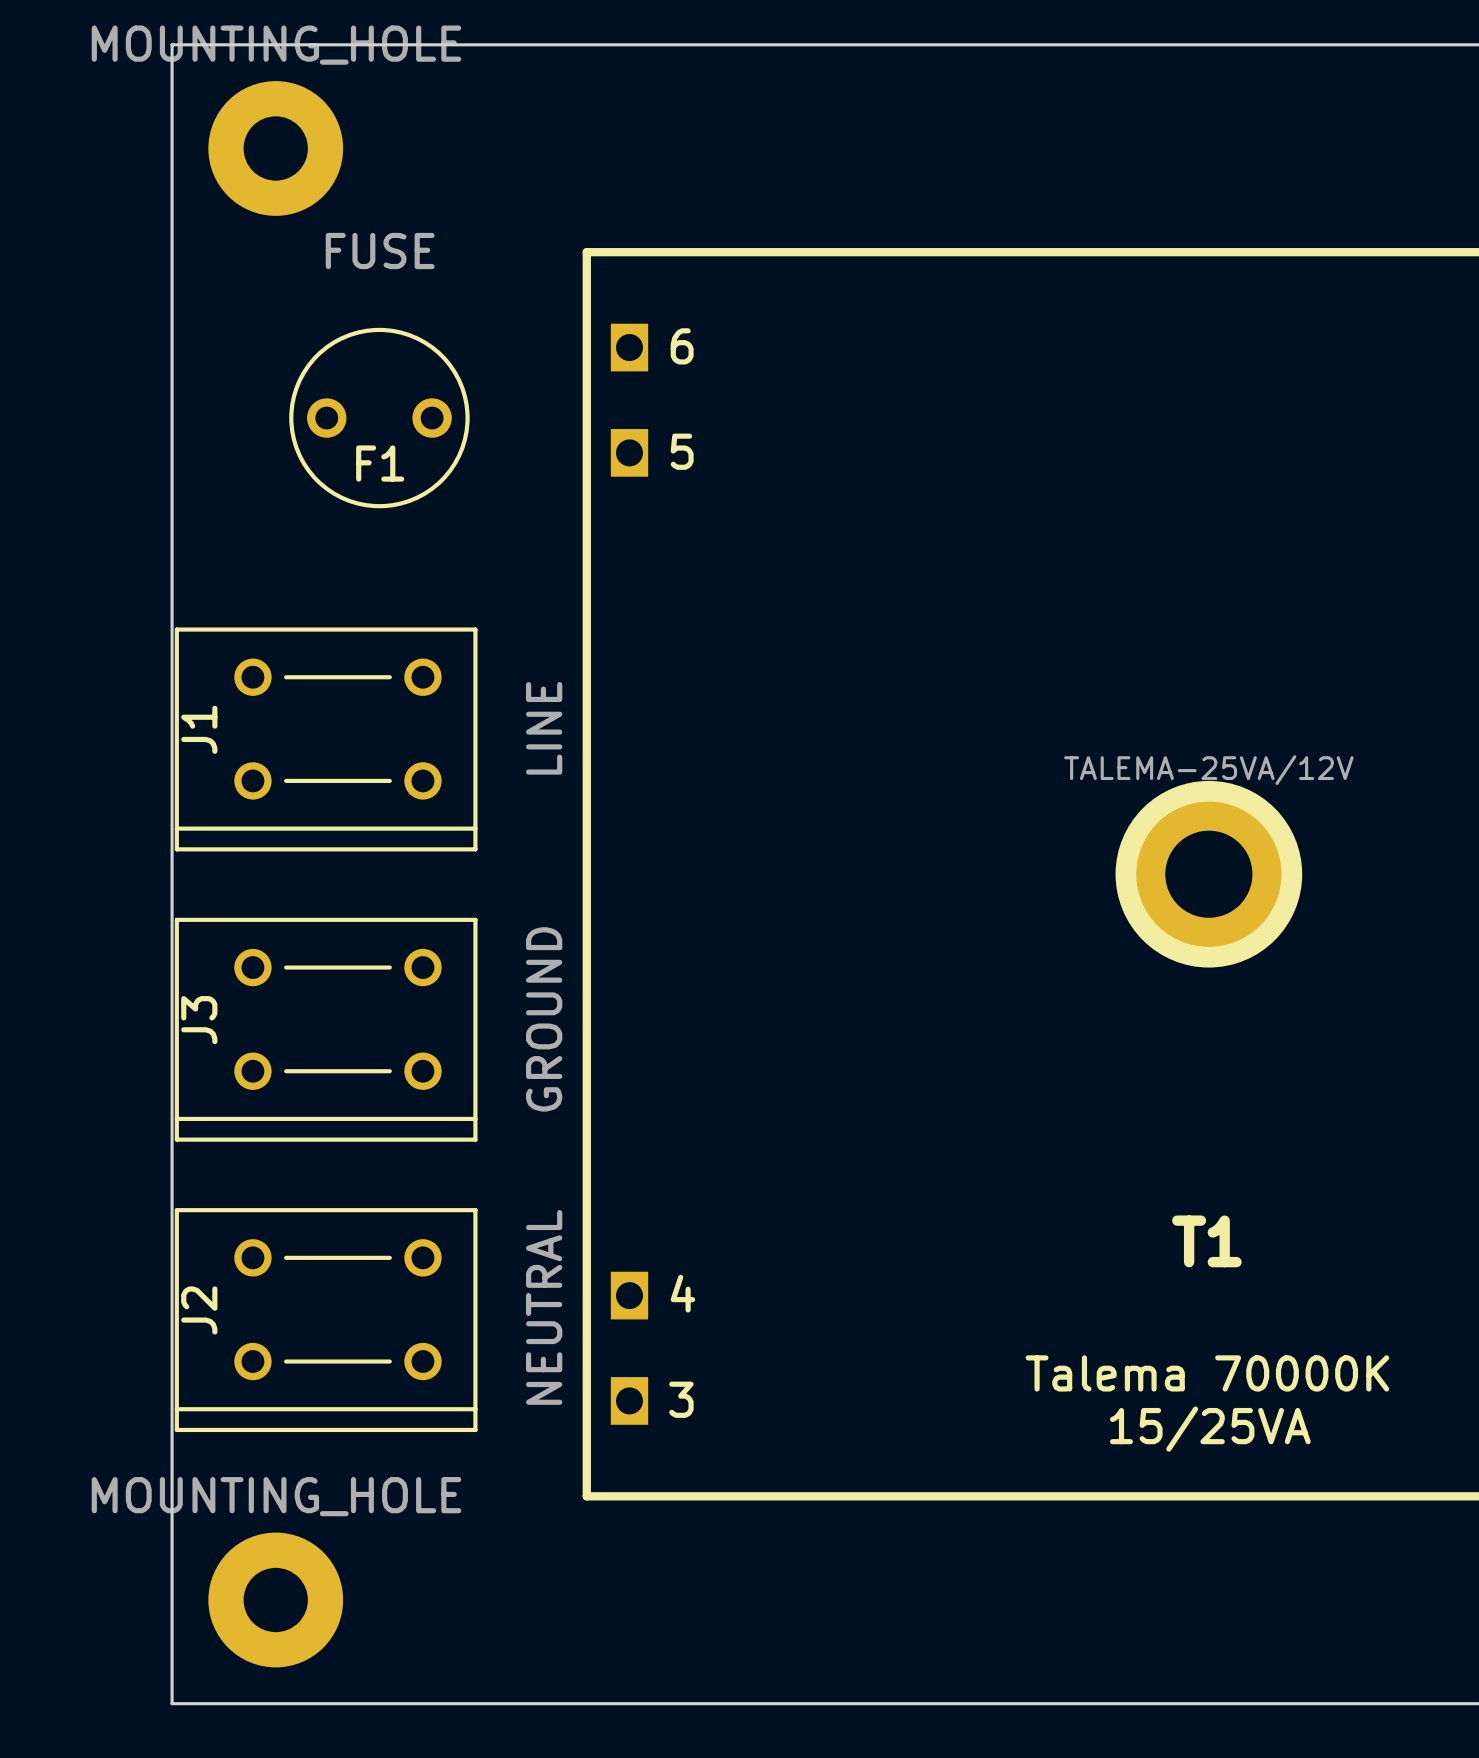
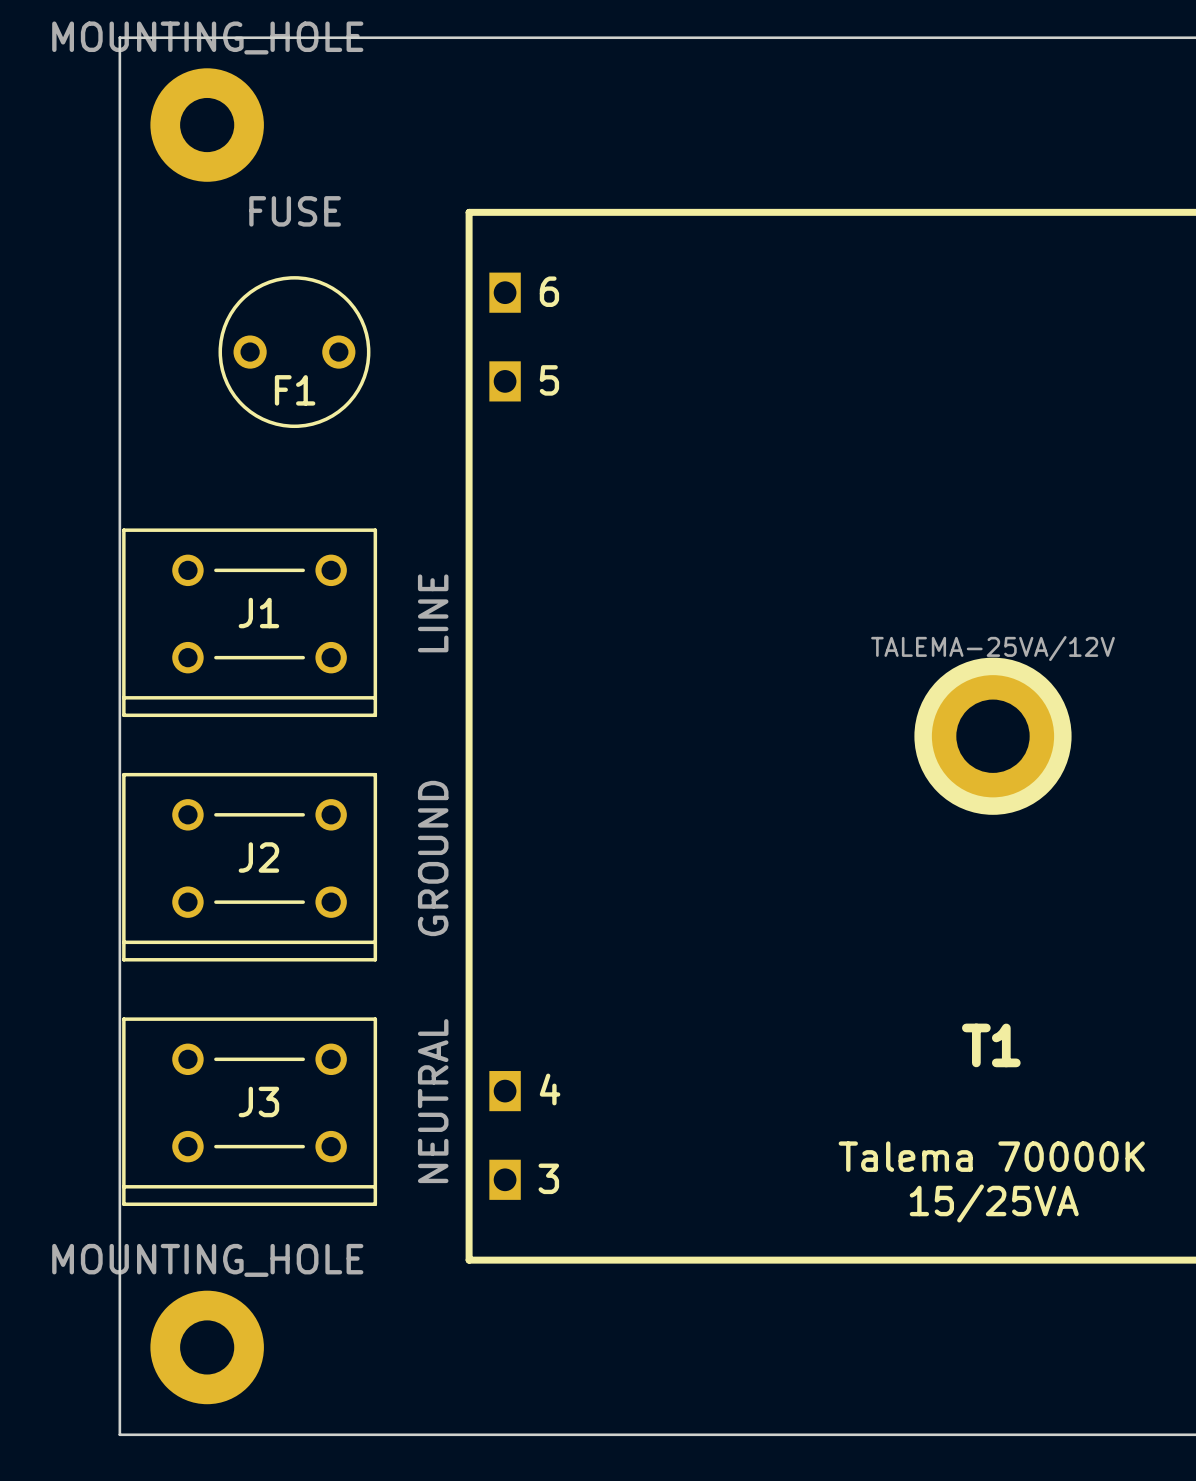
J1 name rotation: 0° (199, 729) -> 90° clockwise (258, 613)
J1 name position: J1 (199, 729) -> J1 (258, 613)
J3 name: J3 (199, 1020) -> J2 (258, 857)
J2 name: J2 (199, 1310) -> J3 (258, 1101)

